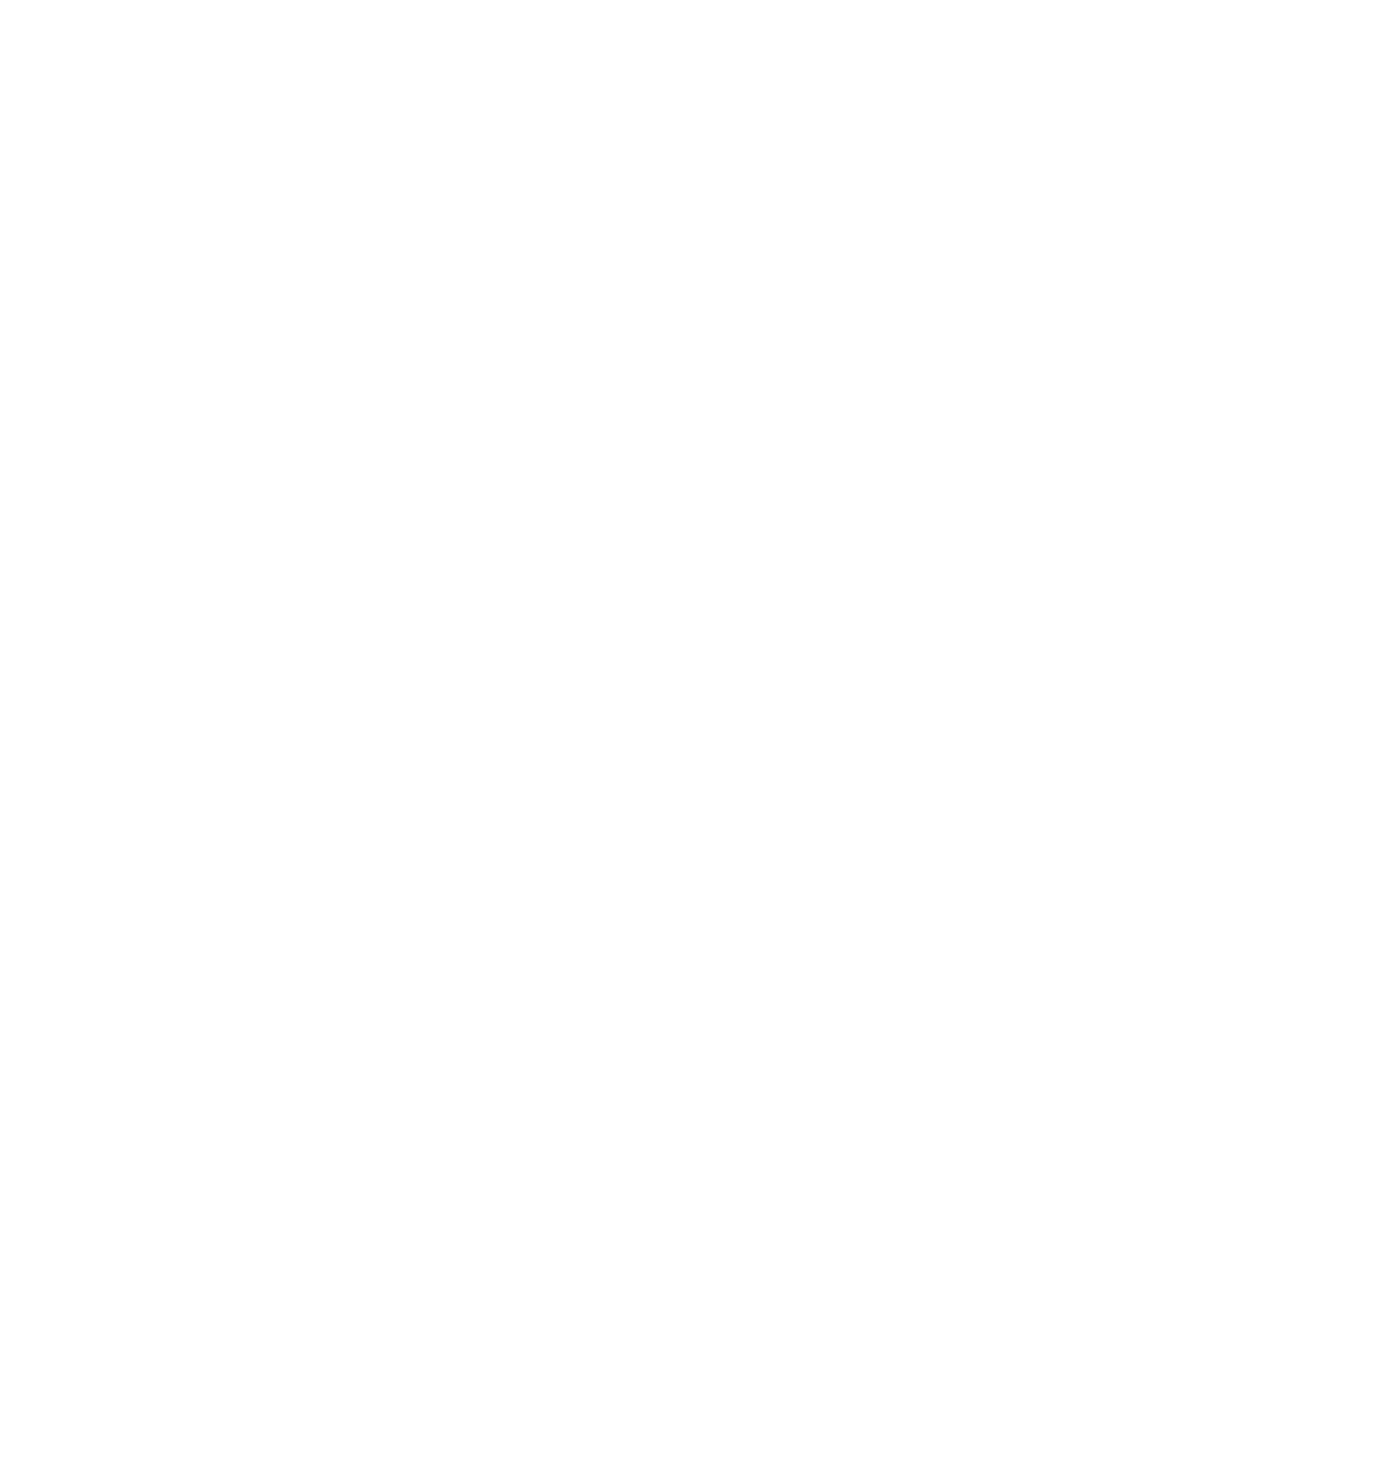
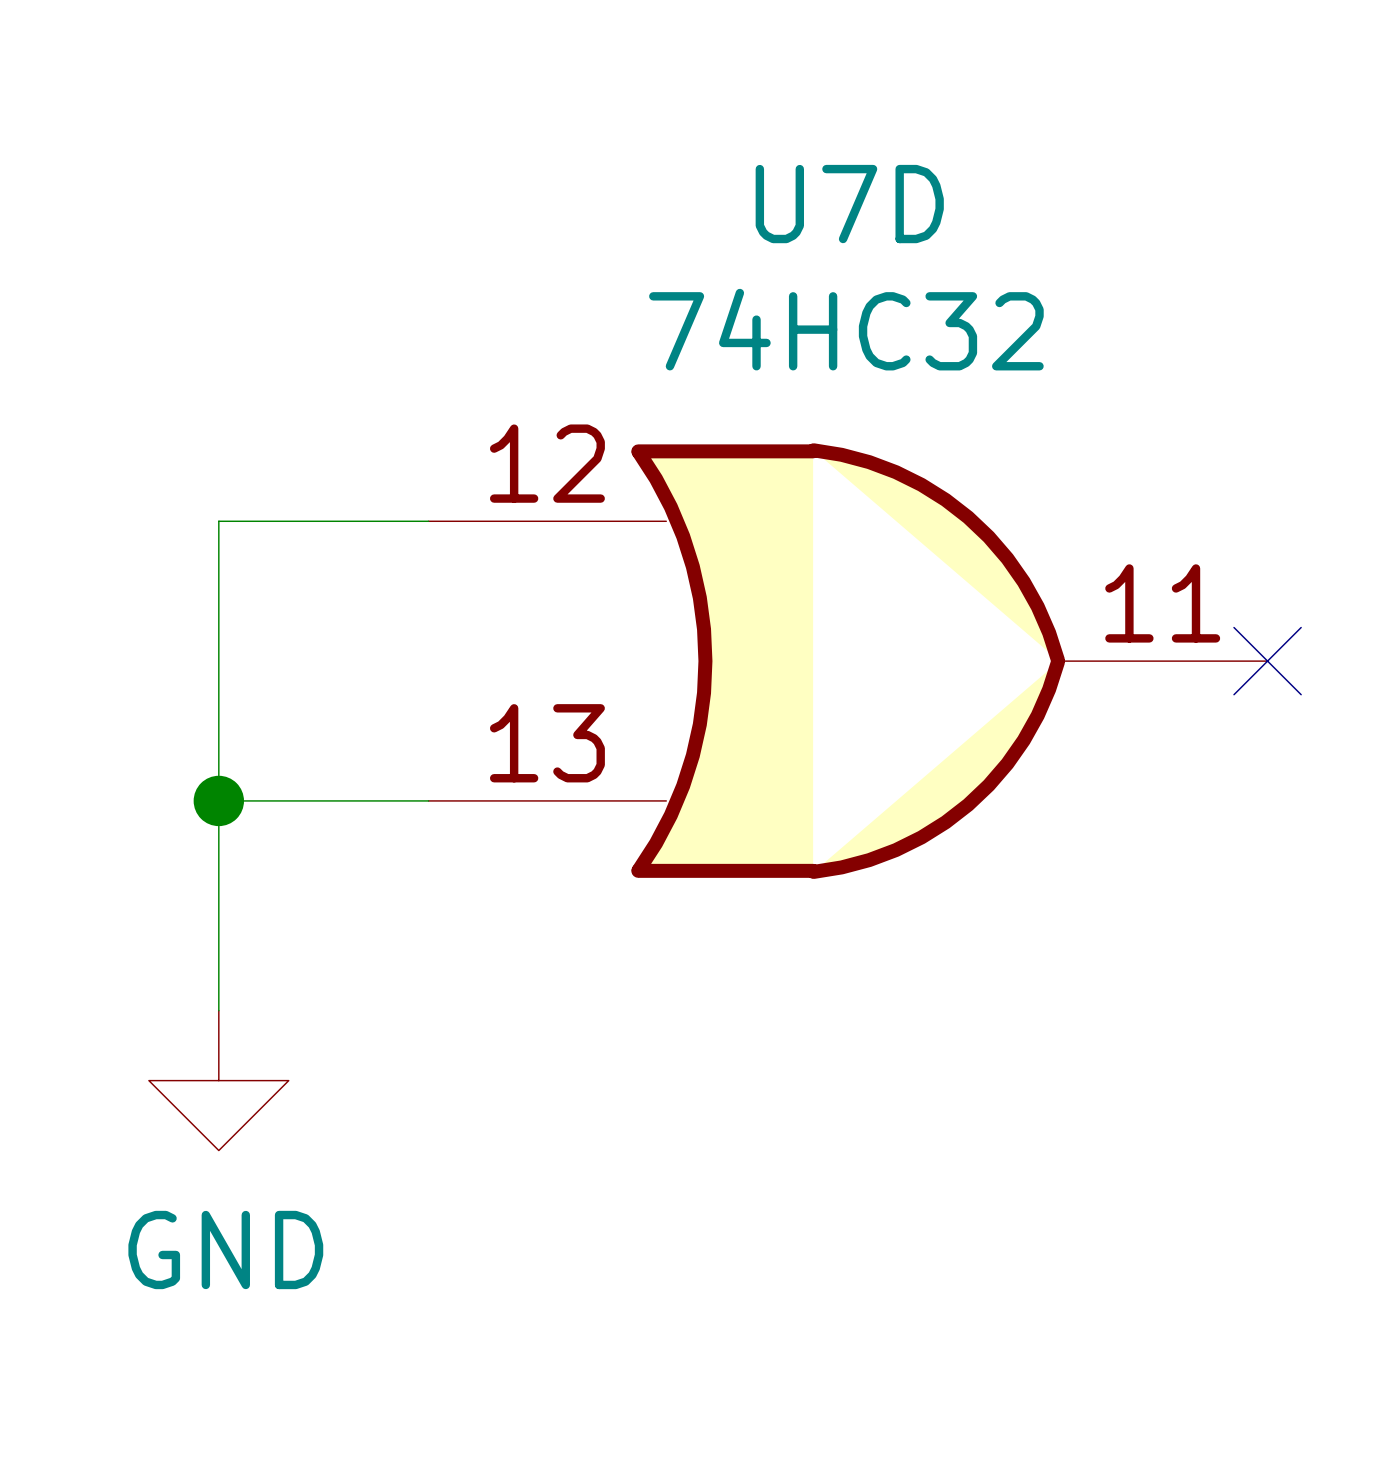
wire: none -> (428, 521) (218, 521) (218, 1010)
U7D: none -> 74HC32 (848, 661)
no-connect mark: none -> (1267, 661)
wire: none -> (218, 800) (428, 800)
junction: none -> (218, 800)
power symbol: none -> GND (218, 1080)

